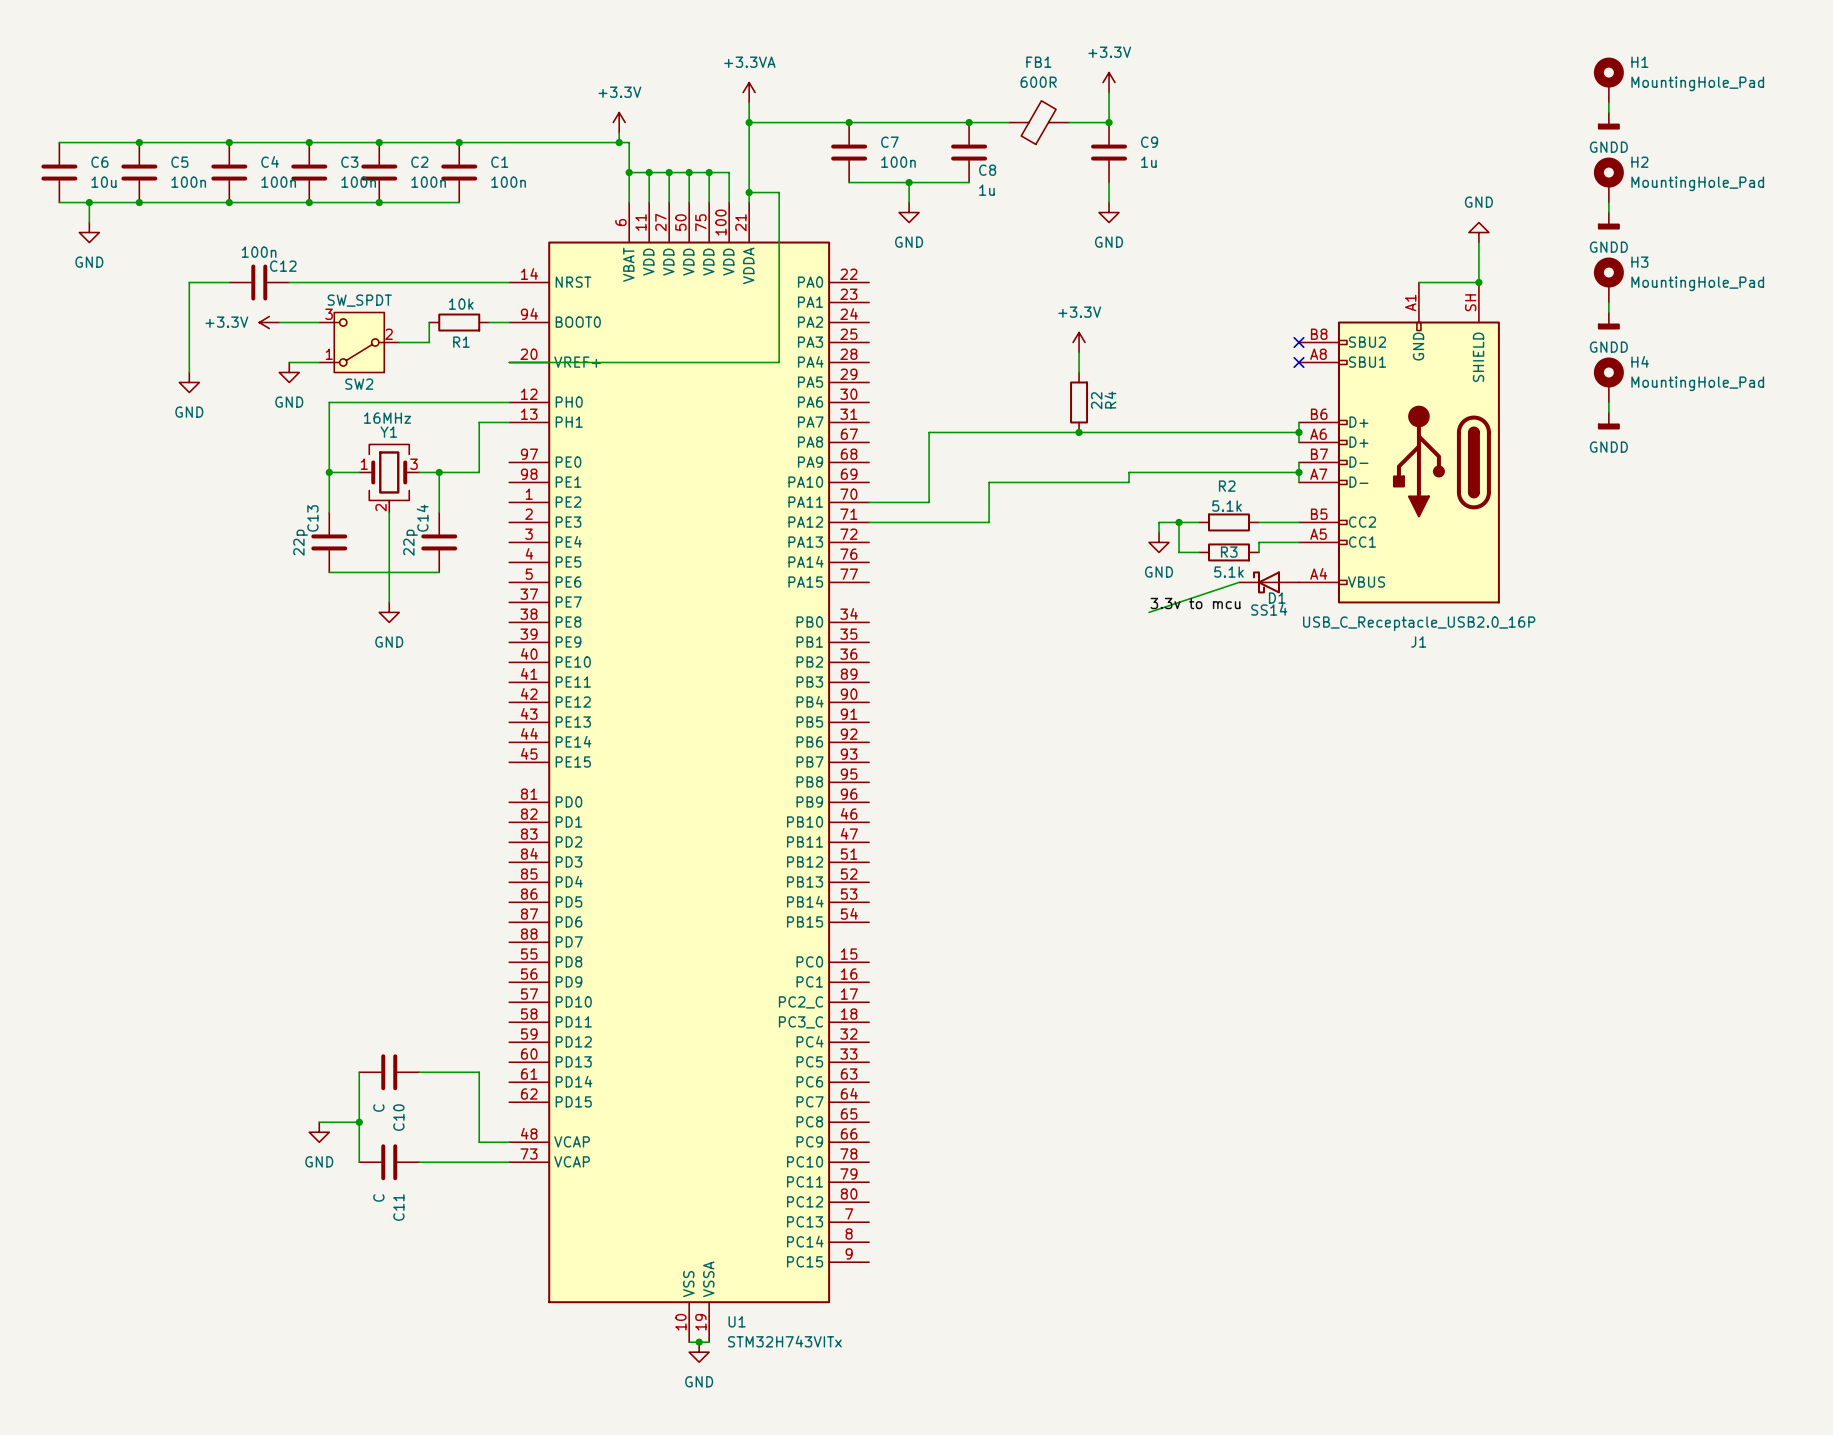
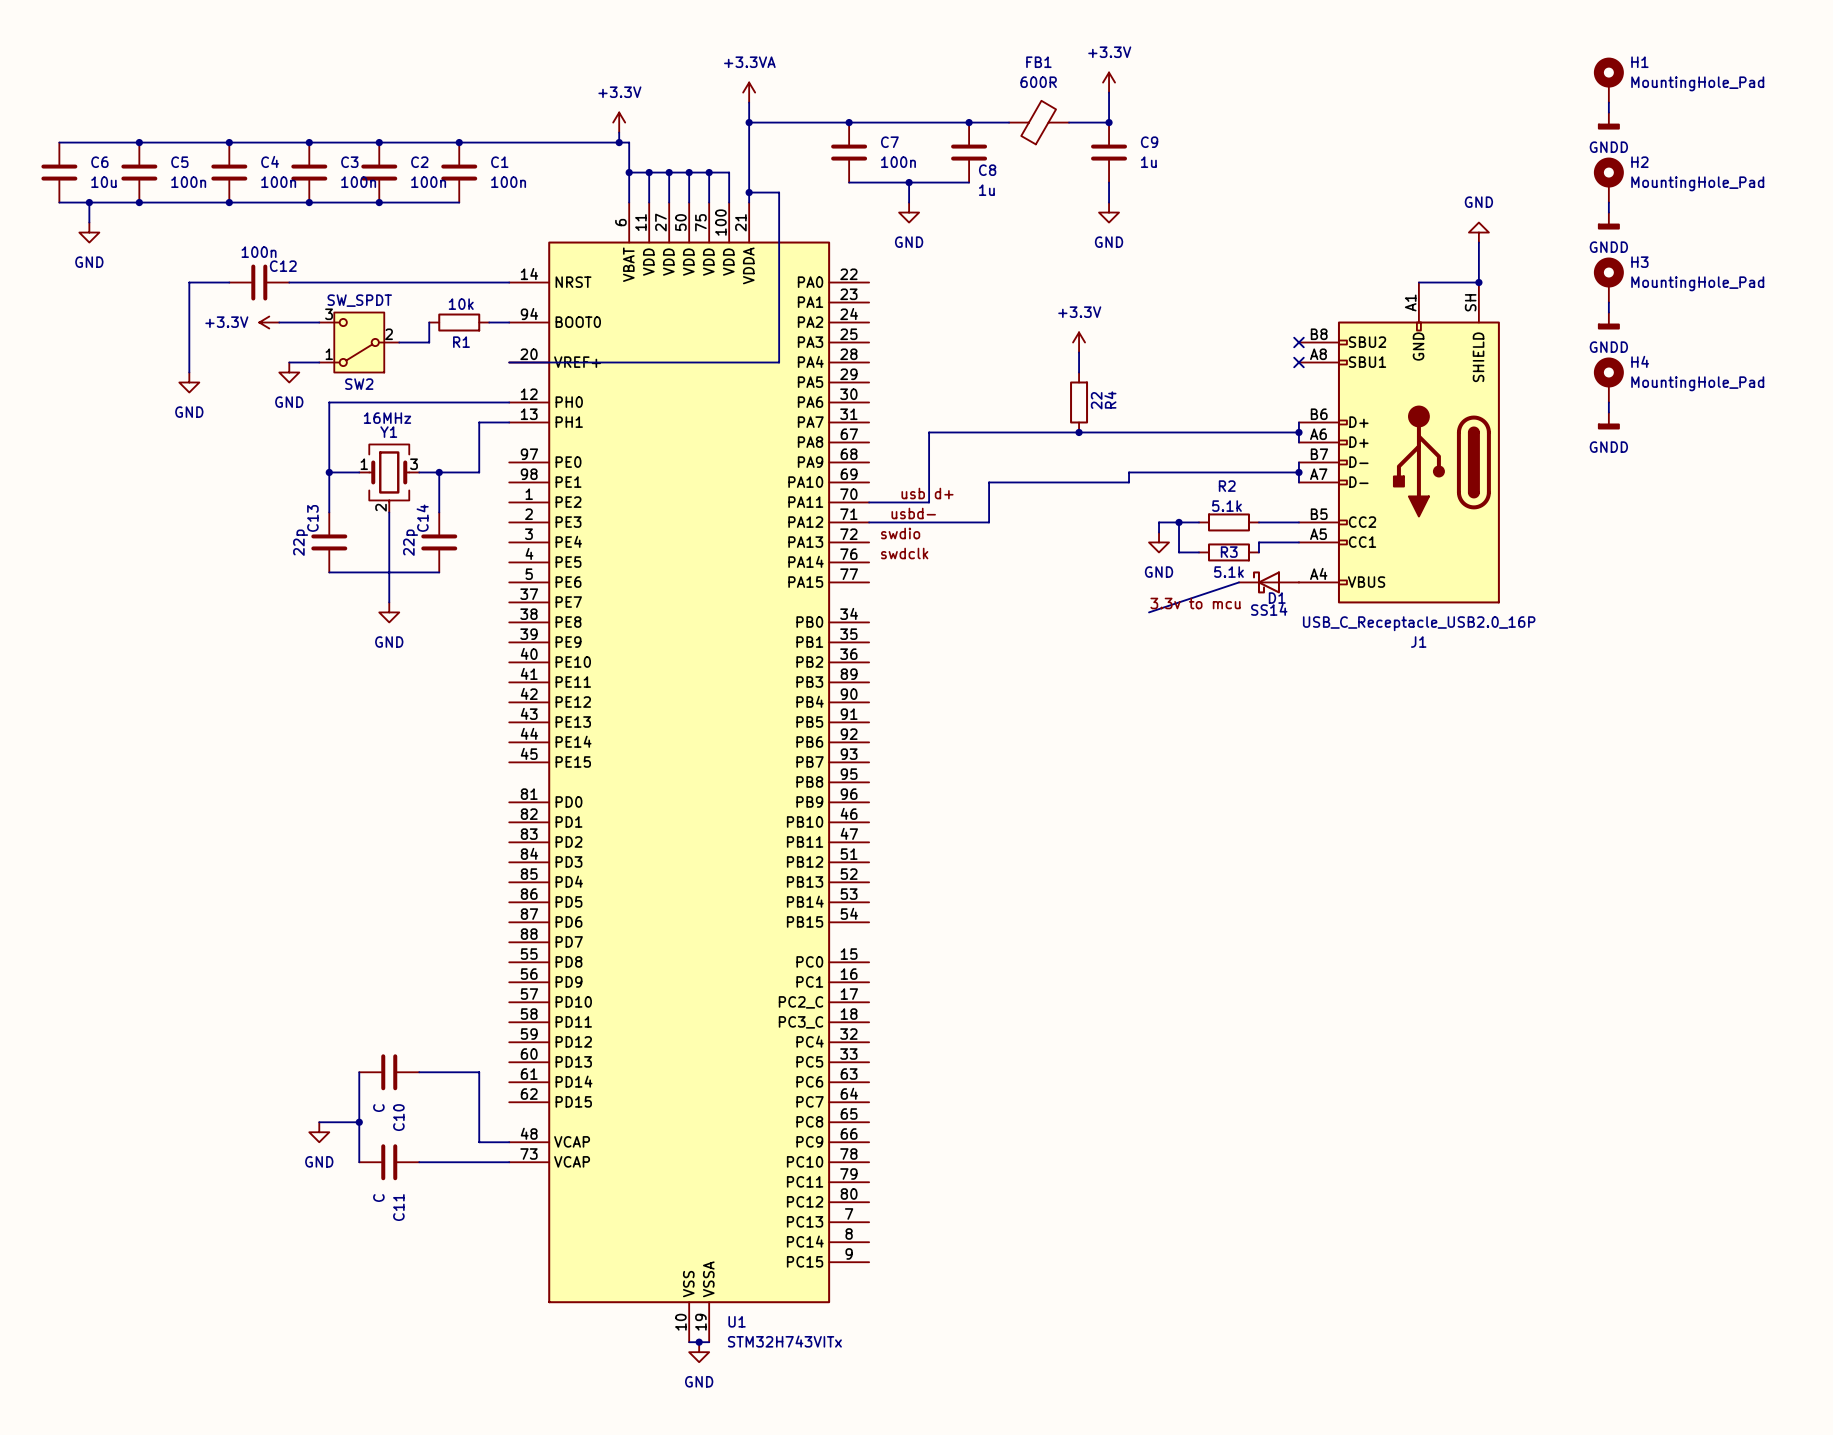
label: none -> usb d+ (927, 493)
label: none -> usbd- (913, 513)
label: none -> swdio (900, 533)
label: none -> swdclk (904, 553)

